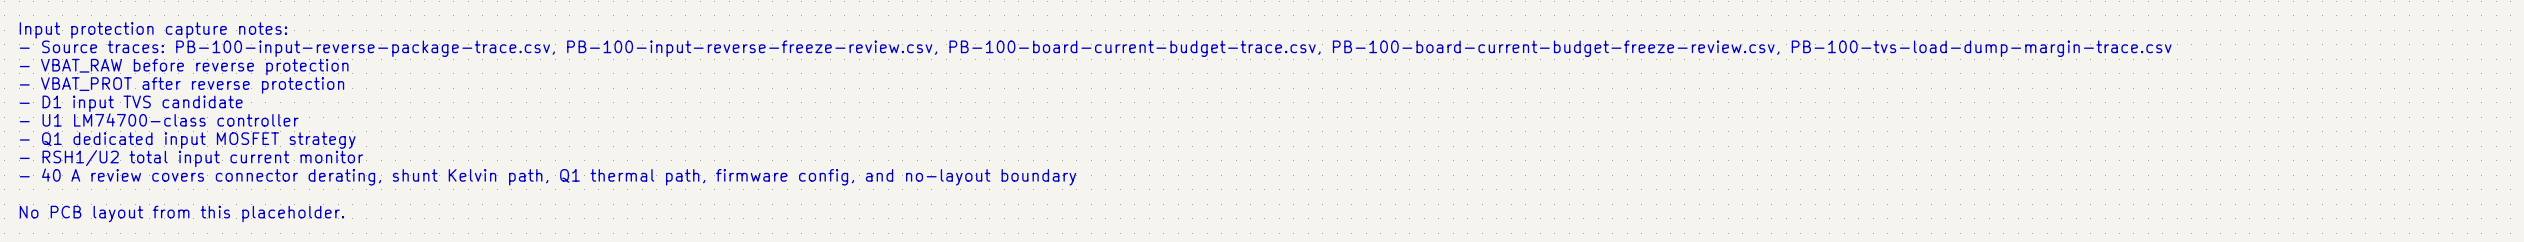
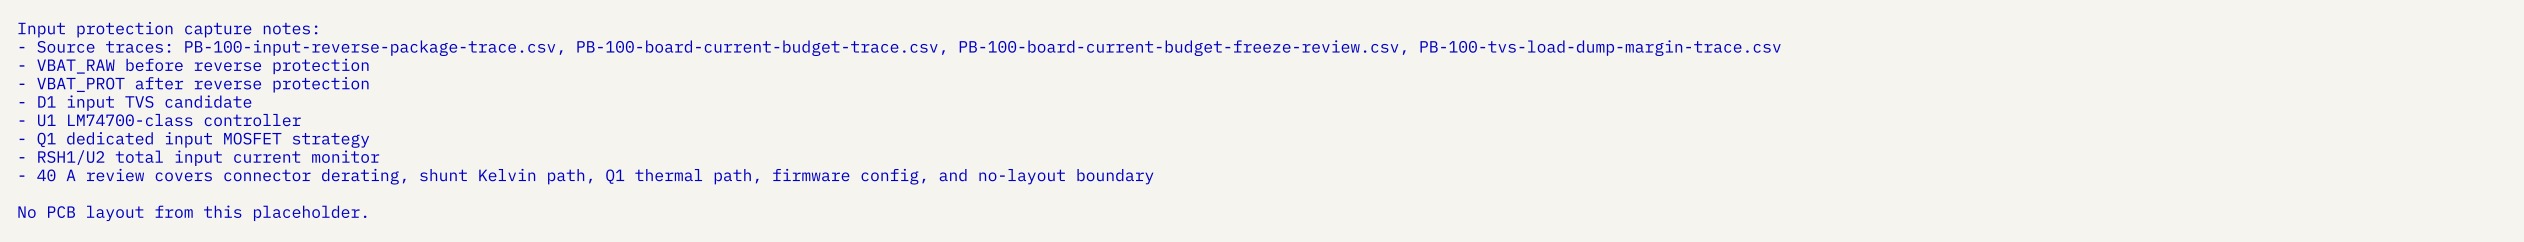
text: - Source traces: PB-100-input-reverse-package-trace.csv, PB-100-input-reverse-freeze-review.csv, PB-100-board-current-budget-trace.csv, PB-100-board-current-budget-freeze-review.csv, PB-100-tvs-load-dump-margin-trace.csv (1095, 48) -> - Source traces: PB-100-input-reverse-package-trace.csv, PB-100-board-current-budget-trace.csv, PB-100-board-current-budget-freeze-review.csv, PB-100-tvs-load-dump-margin-trace.csv (900, 48)

